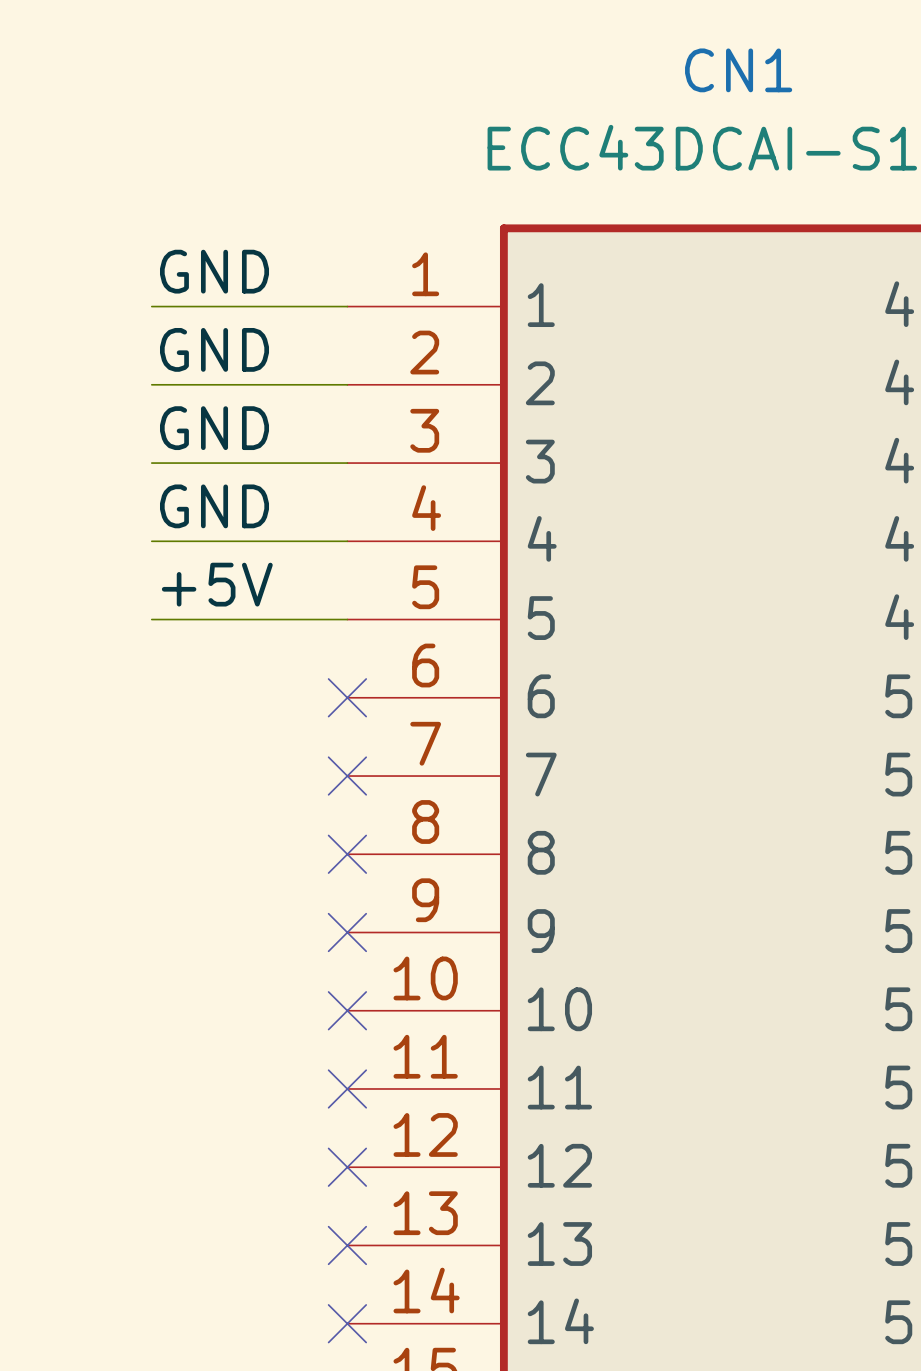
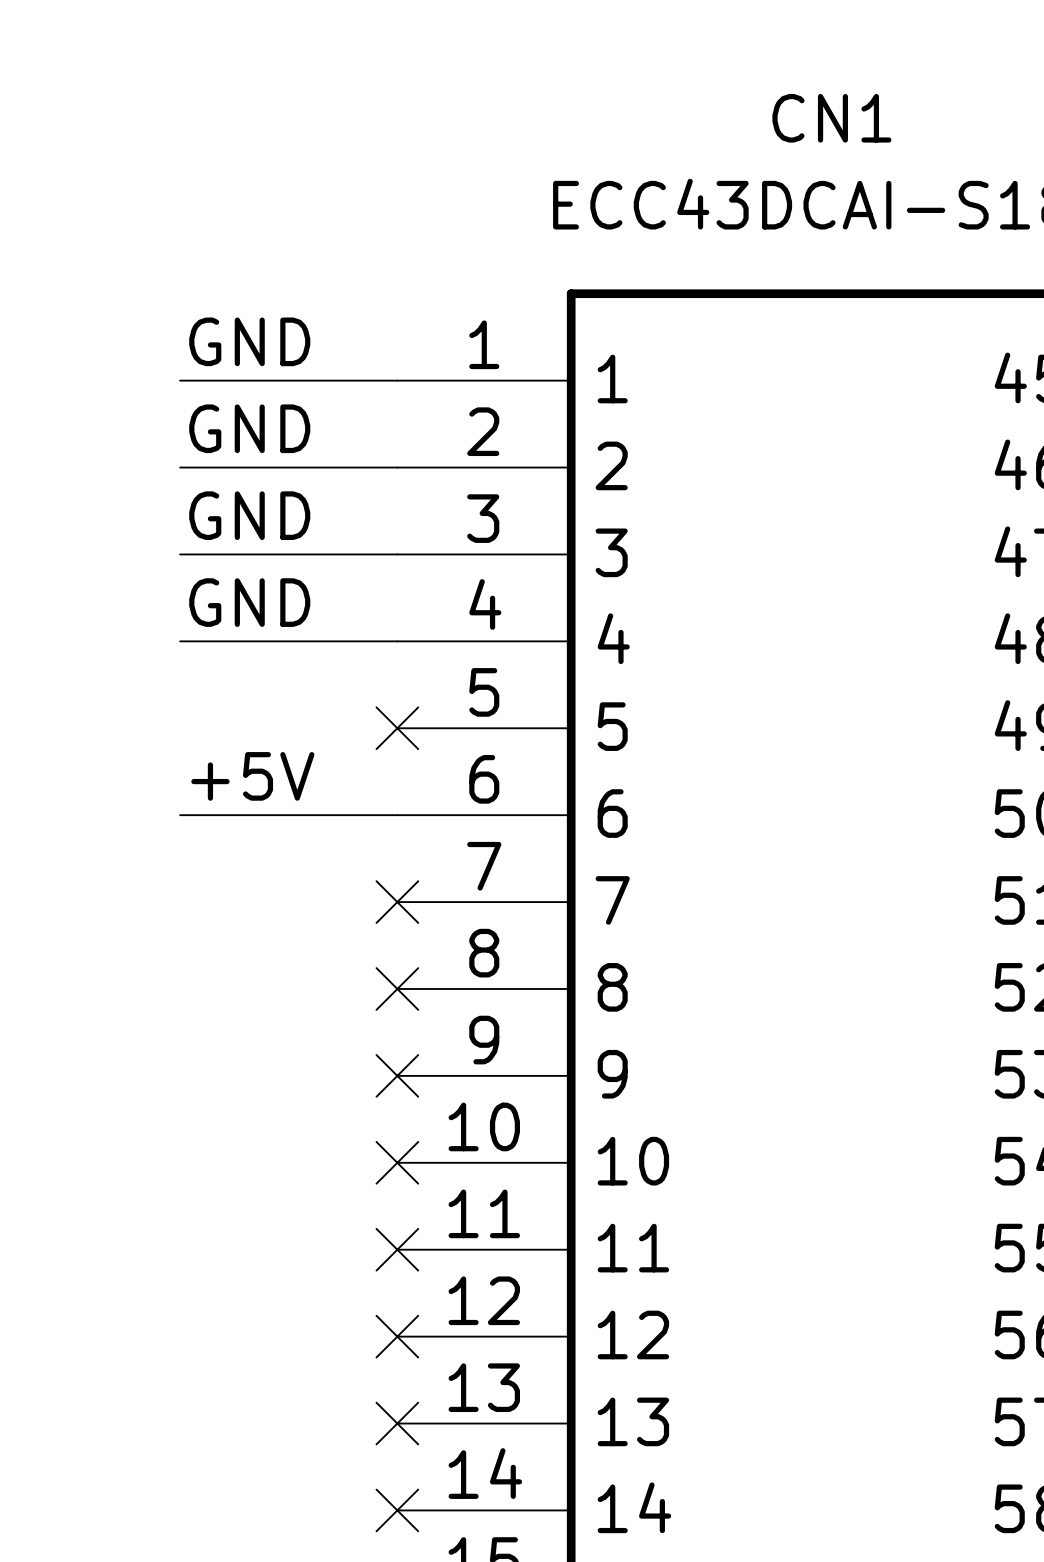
label position: +5V (217, 584) -> +5V (252, 776)
wire: (151, 619) (347, 619) -> (180, 815) (397, 815)
no-connect mark position: (347, 697) -> (397, 728)

